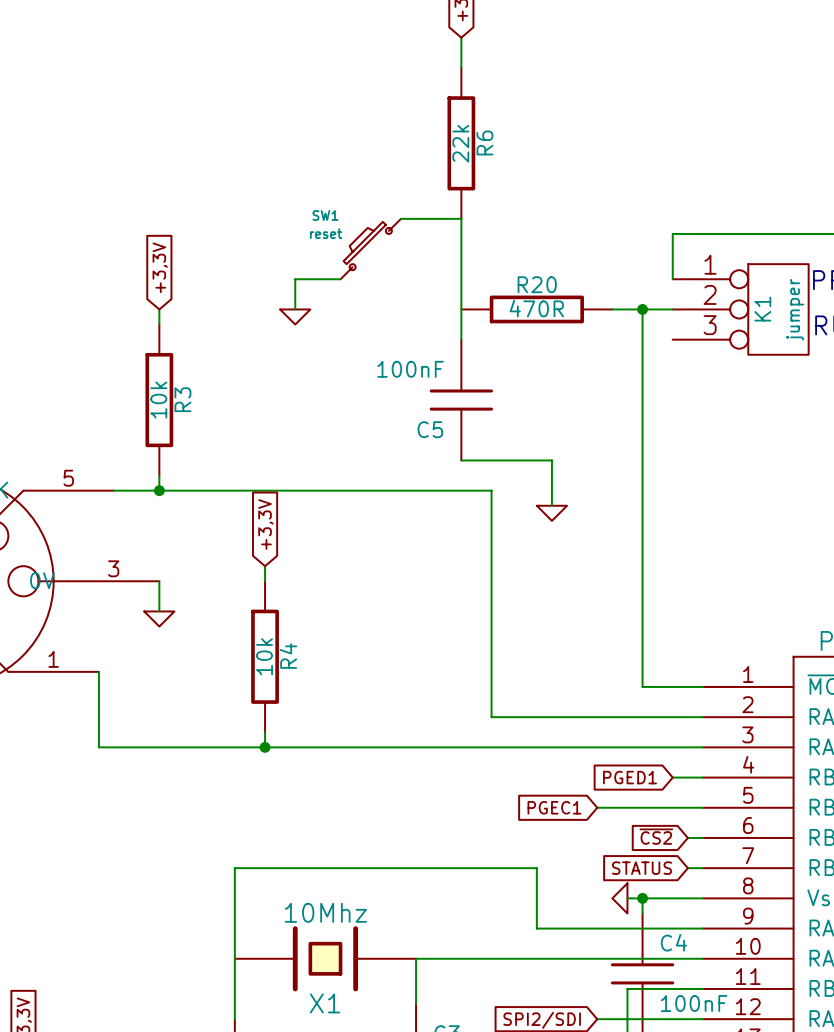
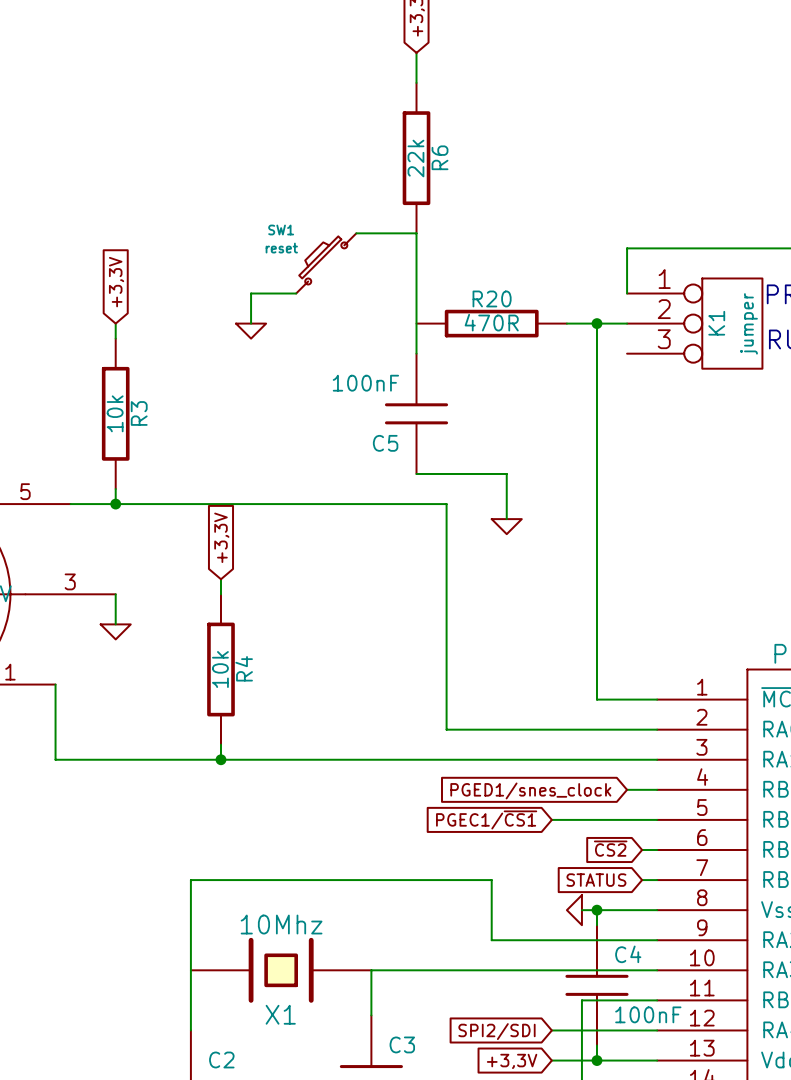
global label: PGED1 (629, 777) -> PGED1/snes_clock (530, 790)
global label: PGEC1 (554, 807) -> PGEC1/~{CS1} (486, 819)

